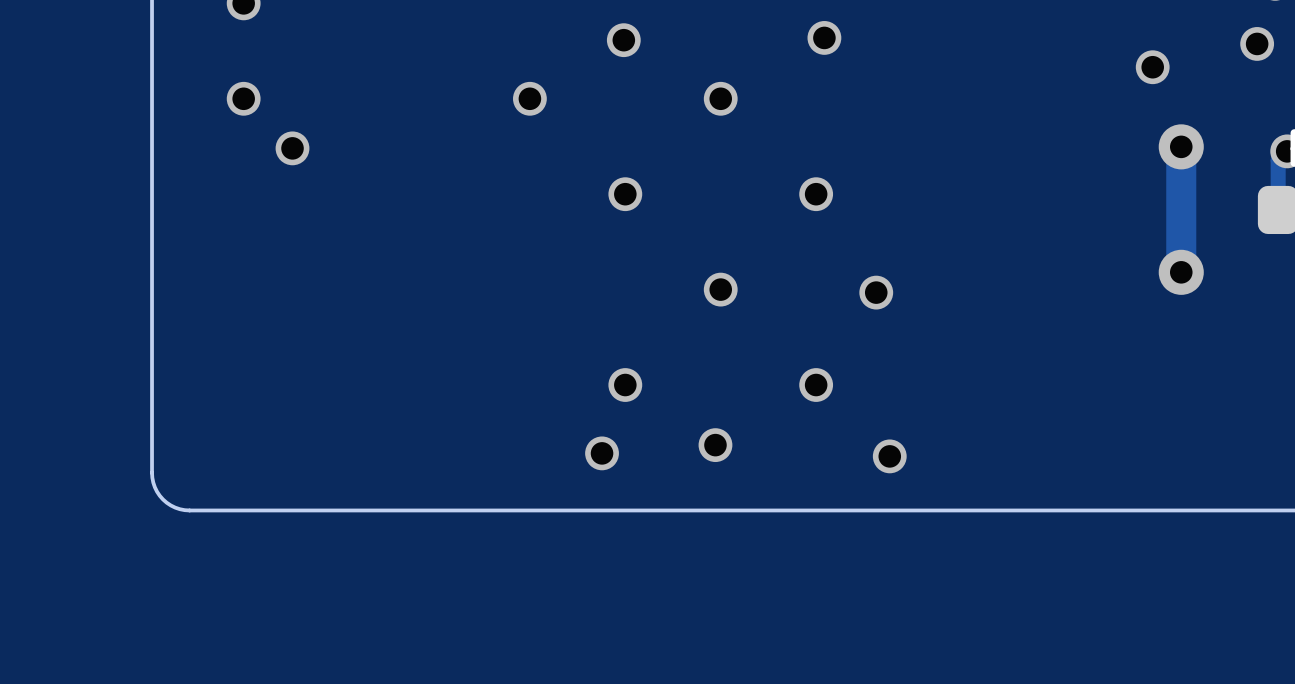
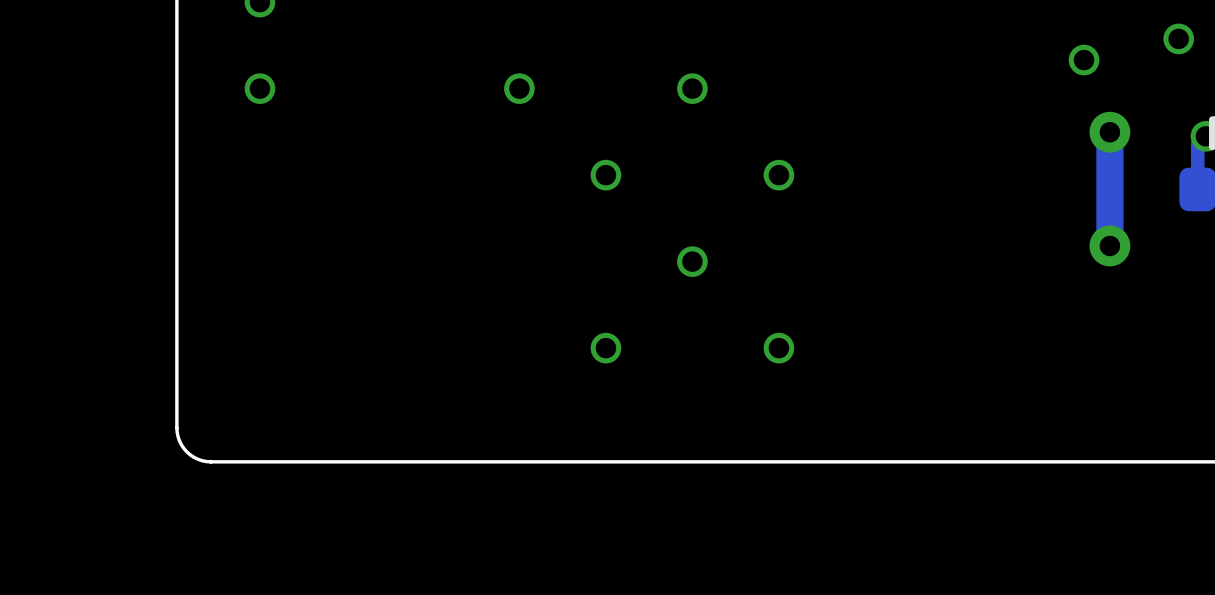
via: (824, 37) -> none
via: (623, 40) -> none
via: (292, 148) -> none
via: (876, 292) -> none
via: (715, 445) -> none
via: (602, 453) -> none
via: (889, 456) -> none

